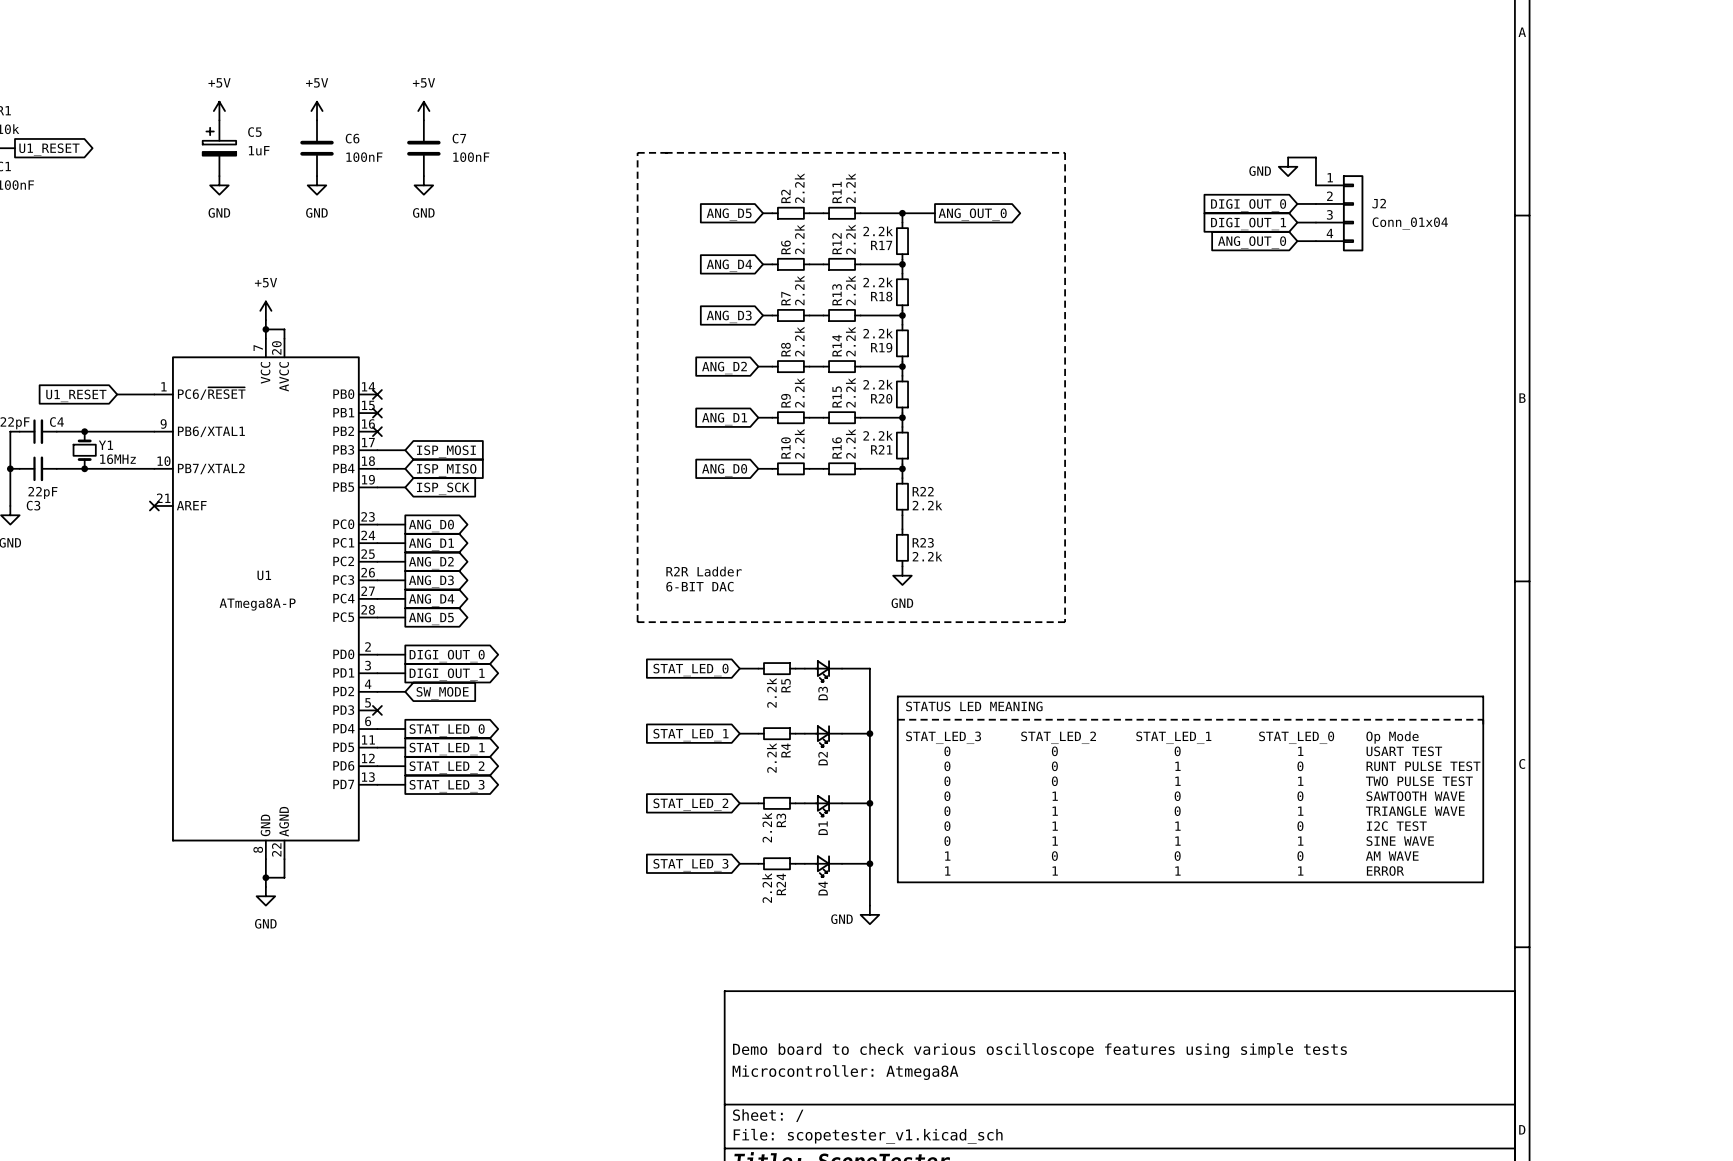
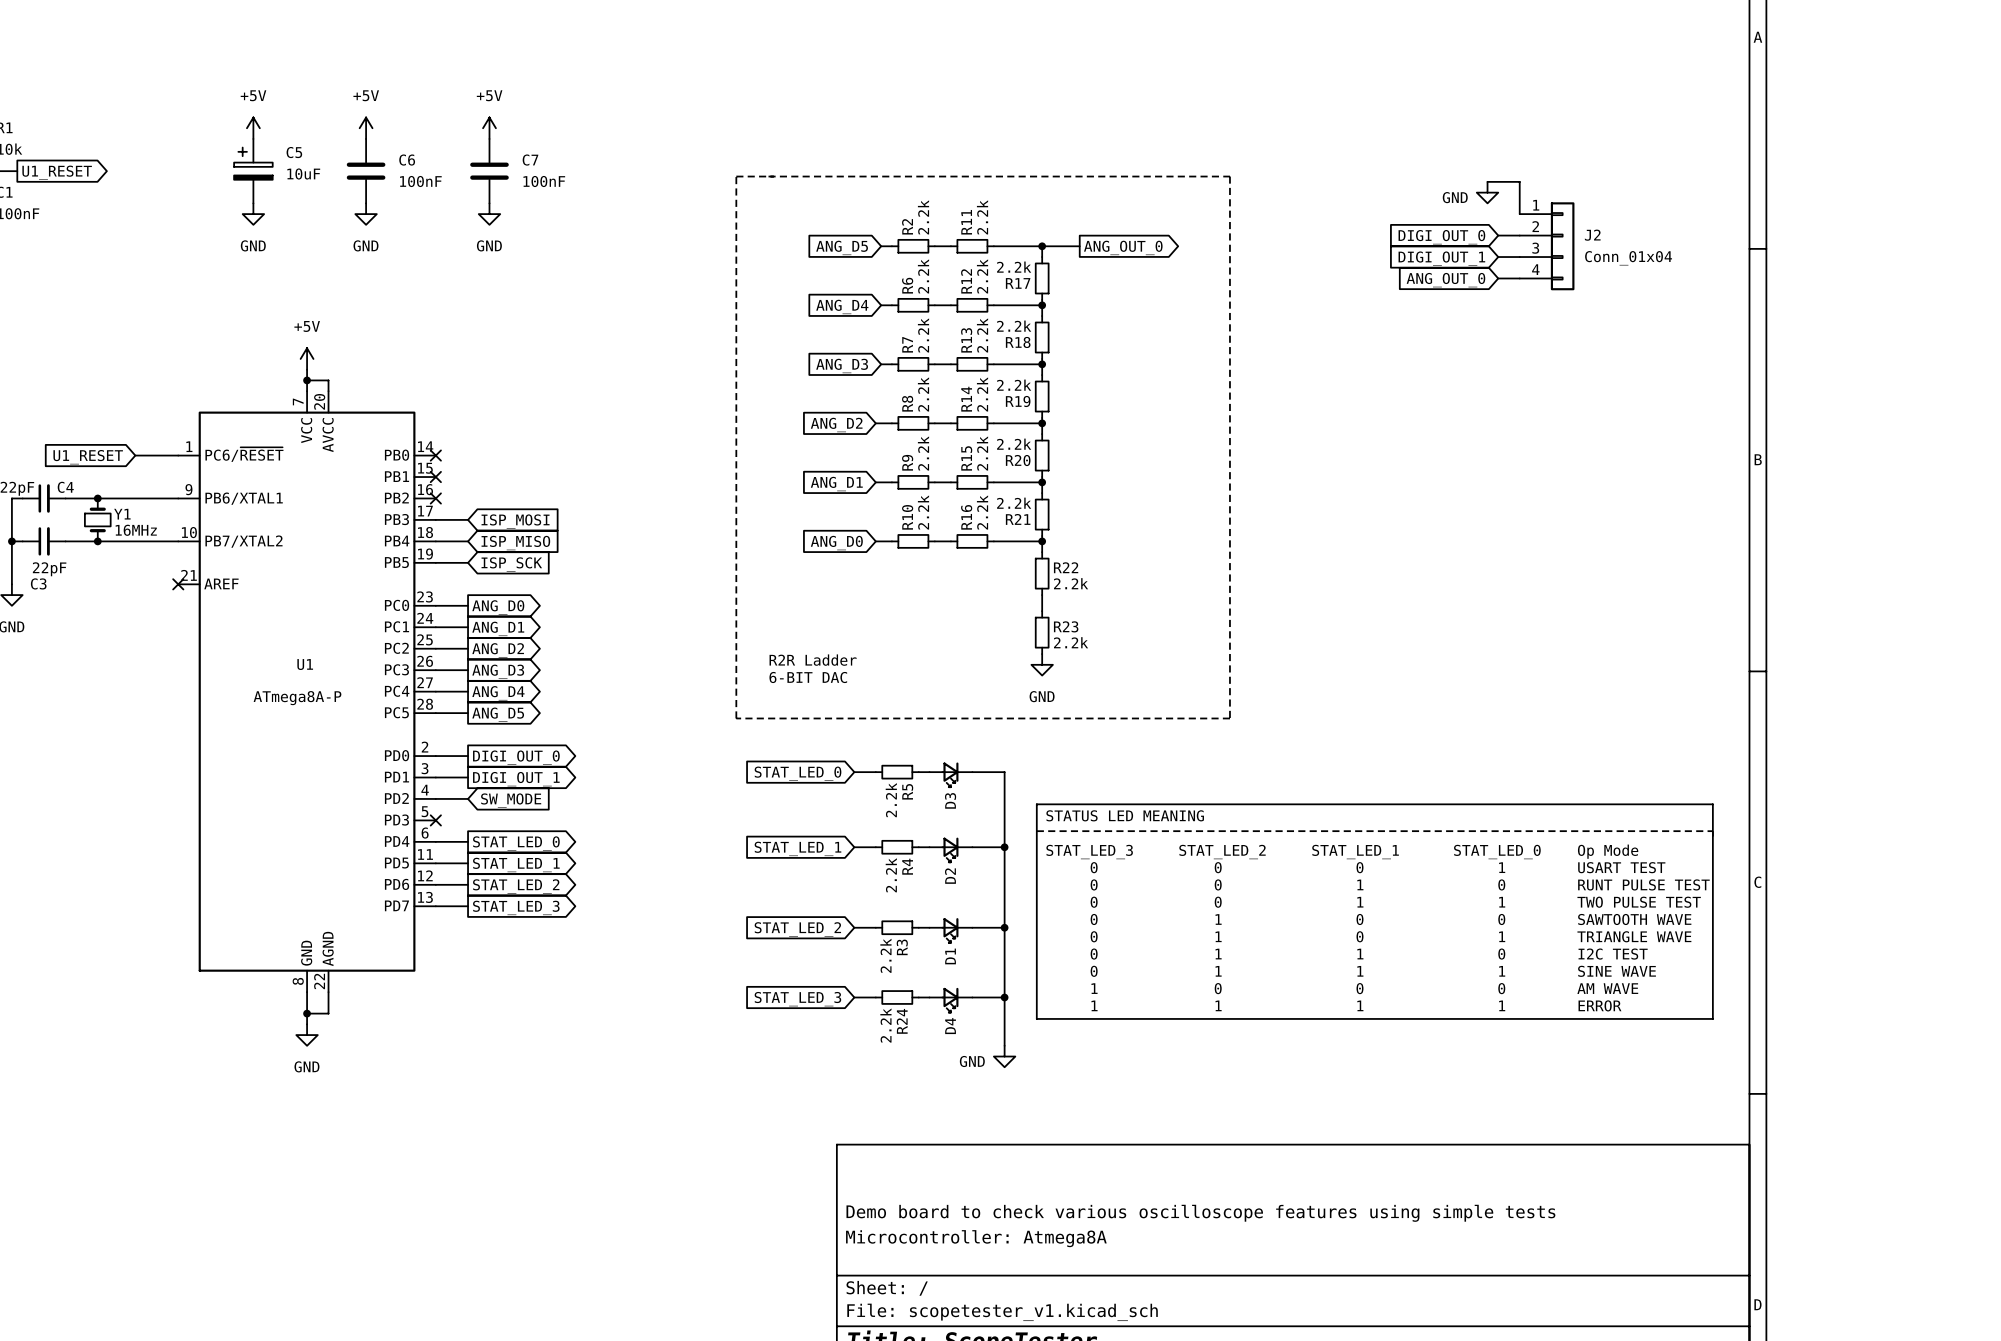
C5 value: 1uF (259, 150) -> 10uF (303, 173)

